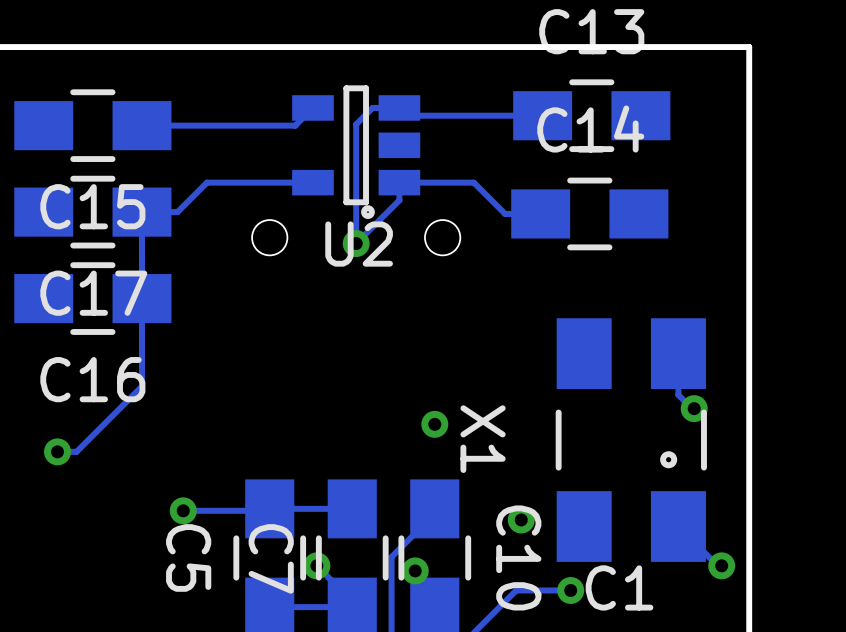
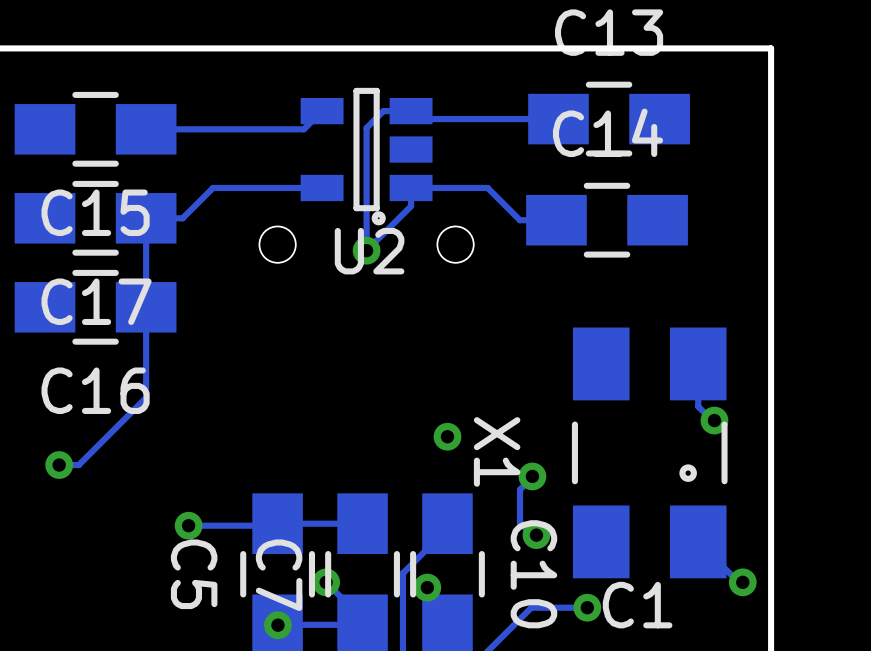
via: none -> (532, 476)
track: none -> (532, 477) (520, 489) (520, 522) (533, 536)
via: none -> (277, 625)

